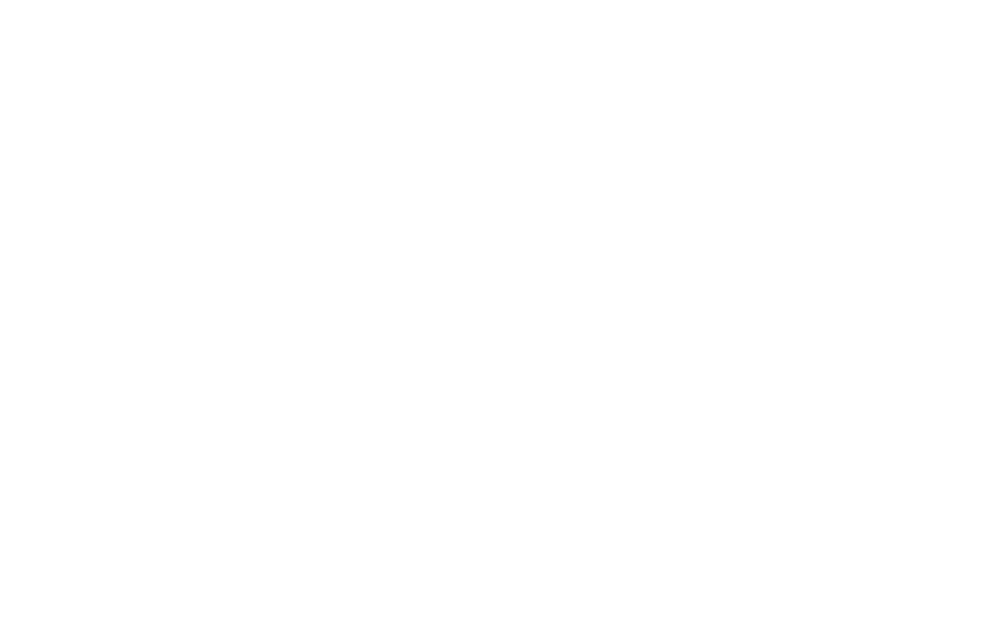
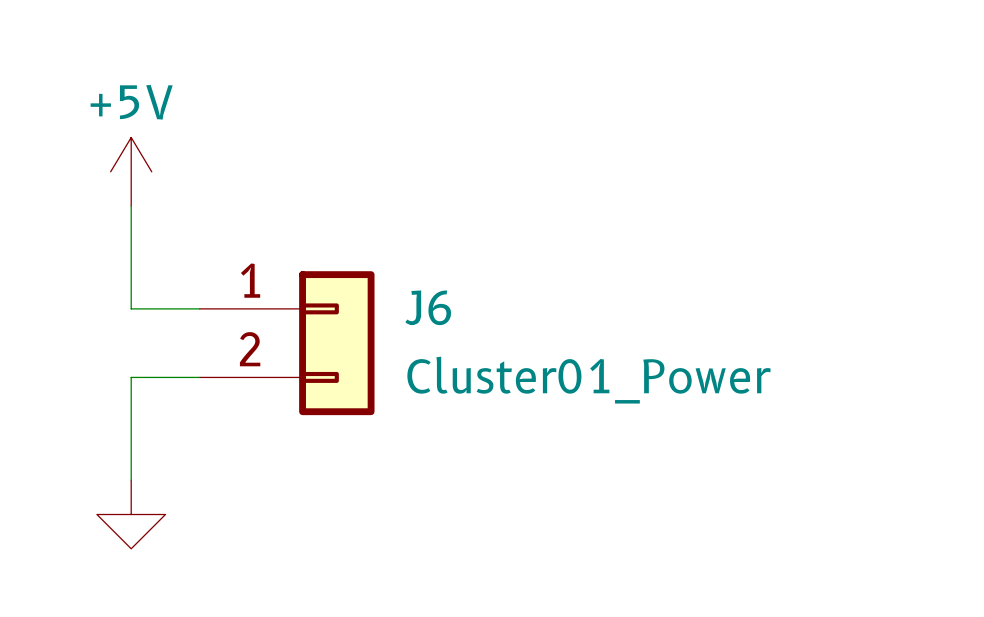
power symbol: none -> +5V (131, 171)
wire: none -> (131, 206) (131, 308) (199, 308)
J6: none -> Cluster01_Power (287, 343)
wire: none -> (199, 377) (131, 377) (131, 480)
power symbol: none -> (131, 514)

